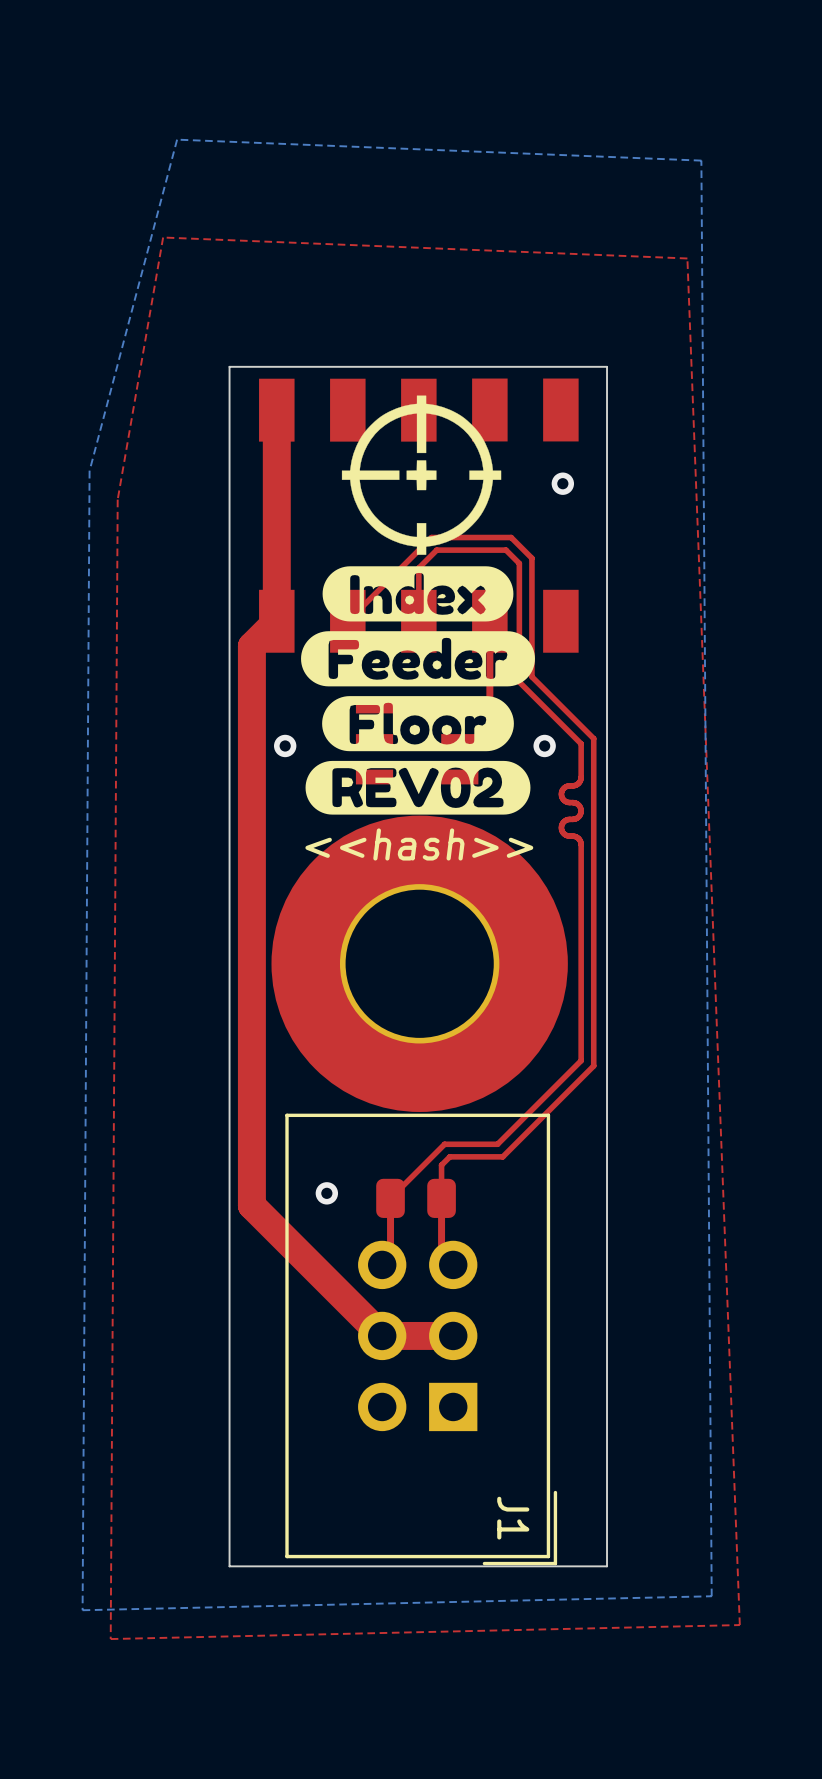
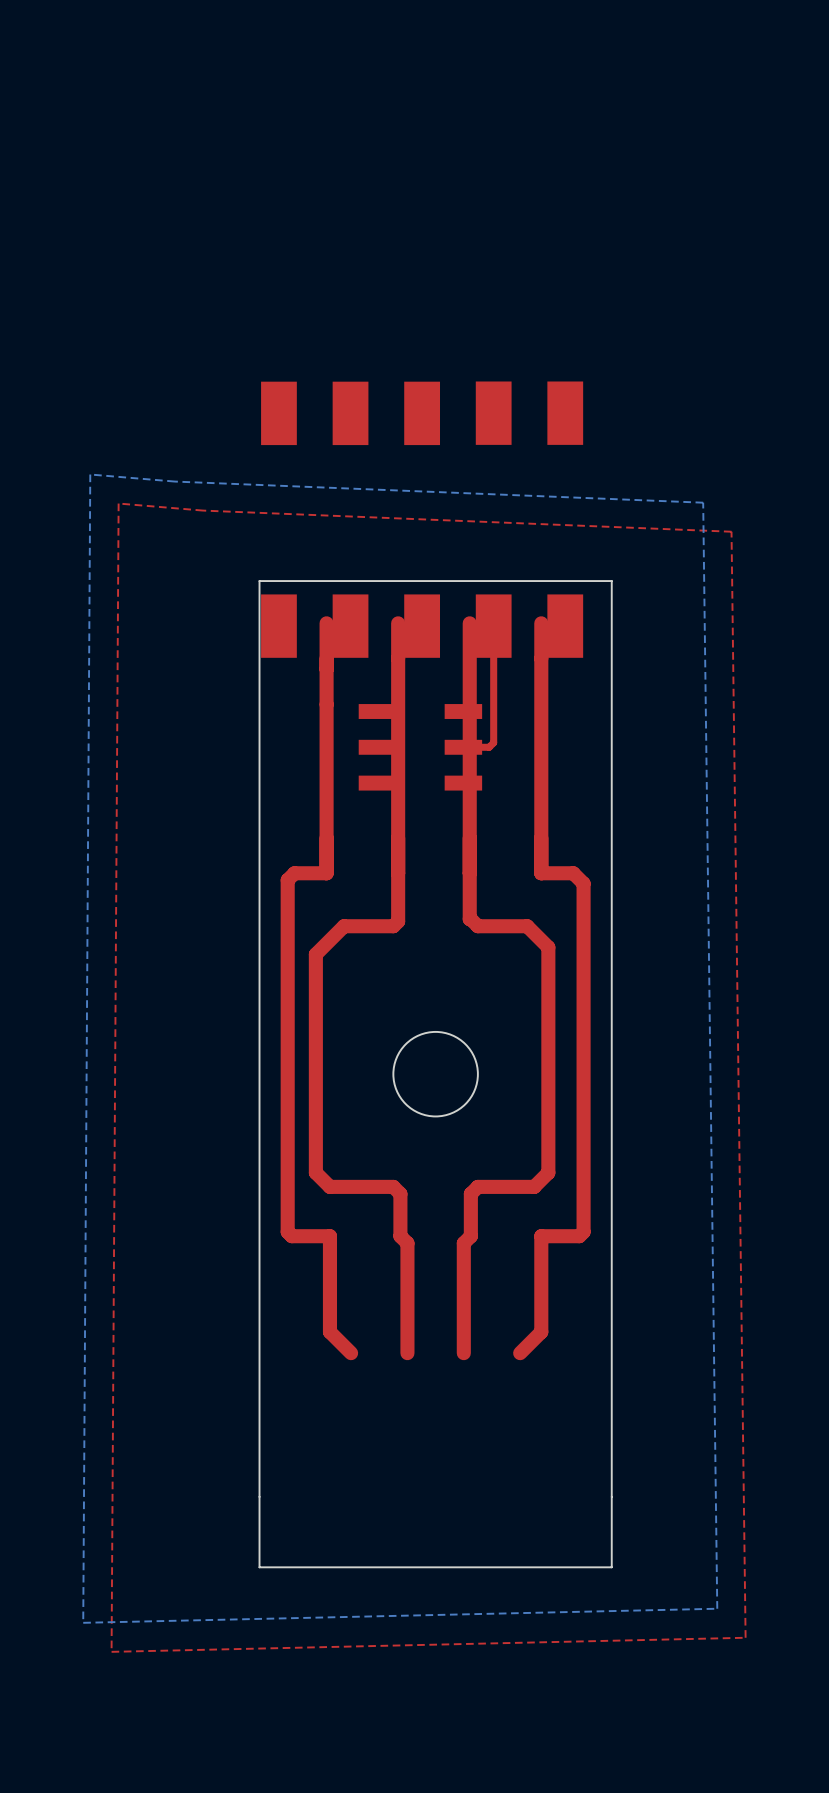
drawing: [301, 395, 535, 815] -> none
top track: (276, 410) (276, 621) (251, 646) (251, 1205) (382, 1335) (453, 1335) -> none
bottom zone outline: (89, 470) (177, 139) (701, 160) (711, 1596) -> (90, 474) (174, 481) (703, 502) (717, 1608)
via: (562, 483) -> none
top zone outline: (117, 499) (163, 237) (687, 258) (739, 1625) -> (118, 503) (203, 510) (731, 531) (745, 1637)
board edge: (607, 576) (607, 366) (229, 366) (229, 1566) (607, 1566) (607, 1555) -> (611, 581) (259, 581) (259, 1567) (611, 1567)
top track: none -> (326, 623) (326, 873) (294, 873) (287, 880) (287, 1231) (291, 1236) (329, 1236) (329, 1332) (351, 1353)
top track: none -> (398, 623) (398, 921) (393, 926) (344, 926) (315, 954) (315, 1172) (329, 1186) (393, 1186) (400, 1193) (400, 1236) (407, 1243) (407, 1353)
top track: none -> (469, 623) (469, 919) (477, 926) (527, 926) (548, 947) (548, 1172) (534, 1186) (477, 1186) (470, 1193) (470, 1236) (463, 1243) (463, 1353)
top track: none -> (541, 623) (541, 873) (573, 873) (583, 883) (583, 1231) (579, 1236) (541, 1236) (541, 1332) (520, 1353)
top track: (347, 621) (431, 537) (511, 537) (531, 558) (531, 676) (593, 738) (593, 1065) (502, 1156) (449, 1156) (441, 1165) (441, 1253) (453, 1264) -> none
top track: (418, 621) (418, 568) (436, 550) (505, 550) (519, 563) (519, 682) (581, 743) (580, 781) (576, 784) (564, 787) (561, 794) (566, 801) (577, 804) (581, 810) (576, 818) (564, 821) (561, 827) (566, 835) (577, 837) (581, 844) (581, 1060) (497, 1144) (444, 1144) (390, 1198) (390, 1256) (382, 1264) -> none
via: (285, 745) -> none
via: (544, 745) -> none
text: <<hash>> (419, 844) -> none
part: (419, 963) -> none
round board edge: none -> [392, 1031, 479, 1118]
via: (326, 1193) -> none
part: (416, 1198) -> none
J1: (421, 1339) -> none

